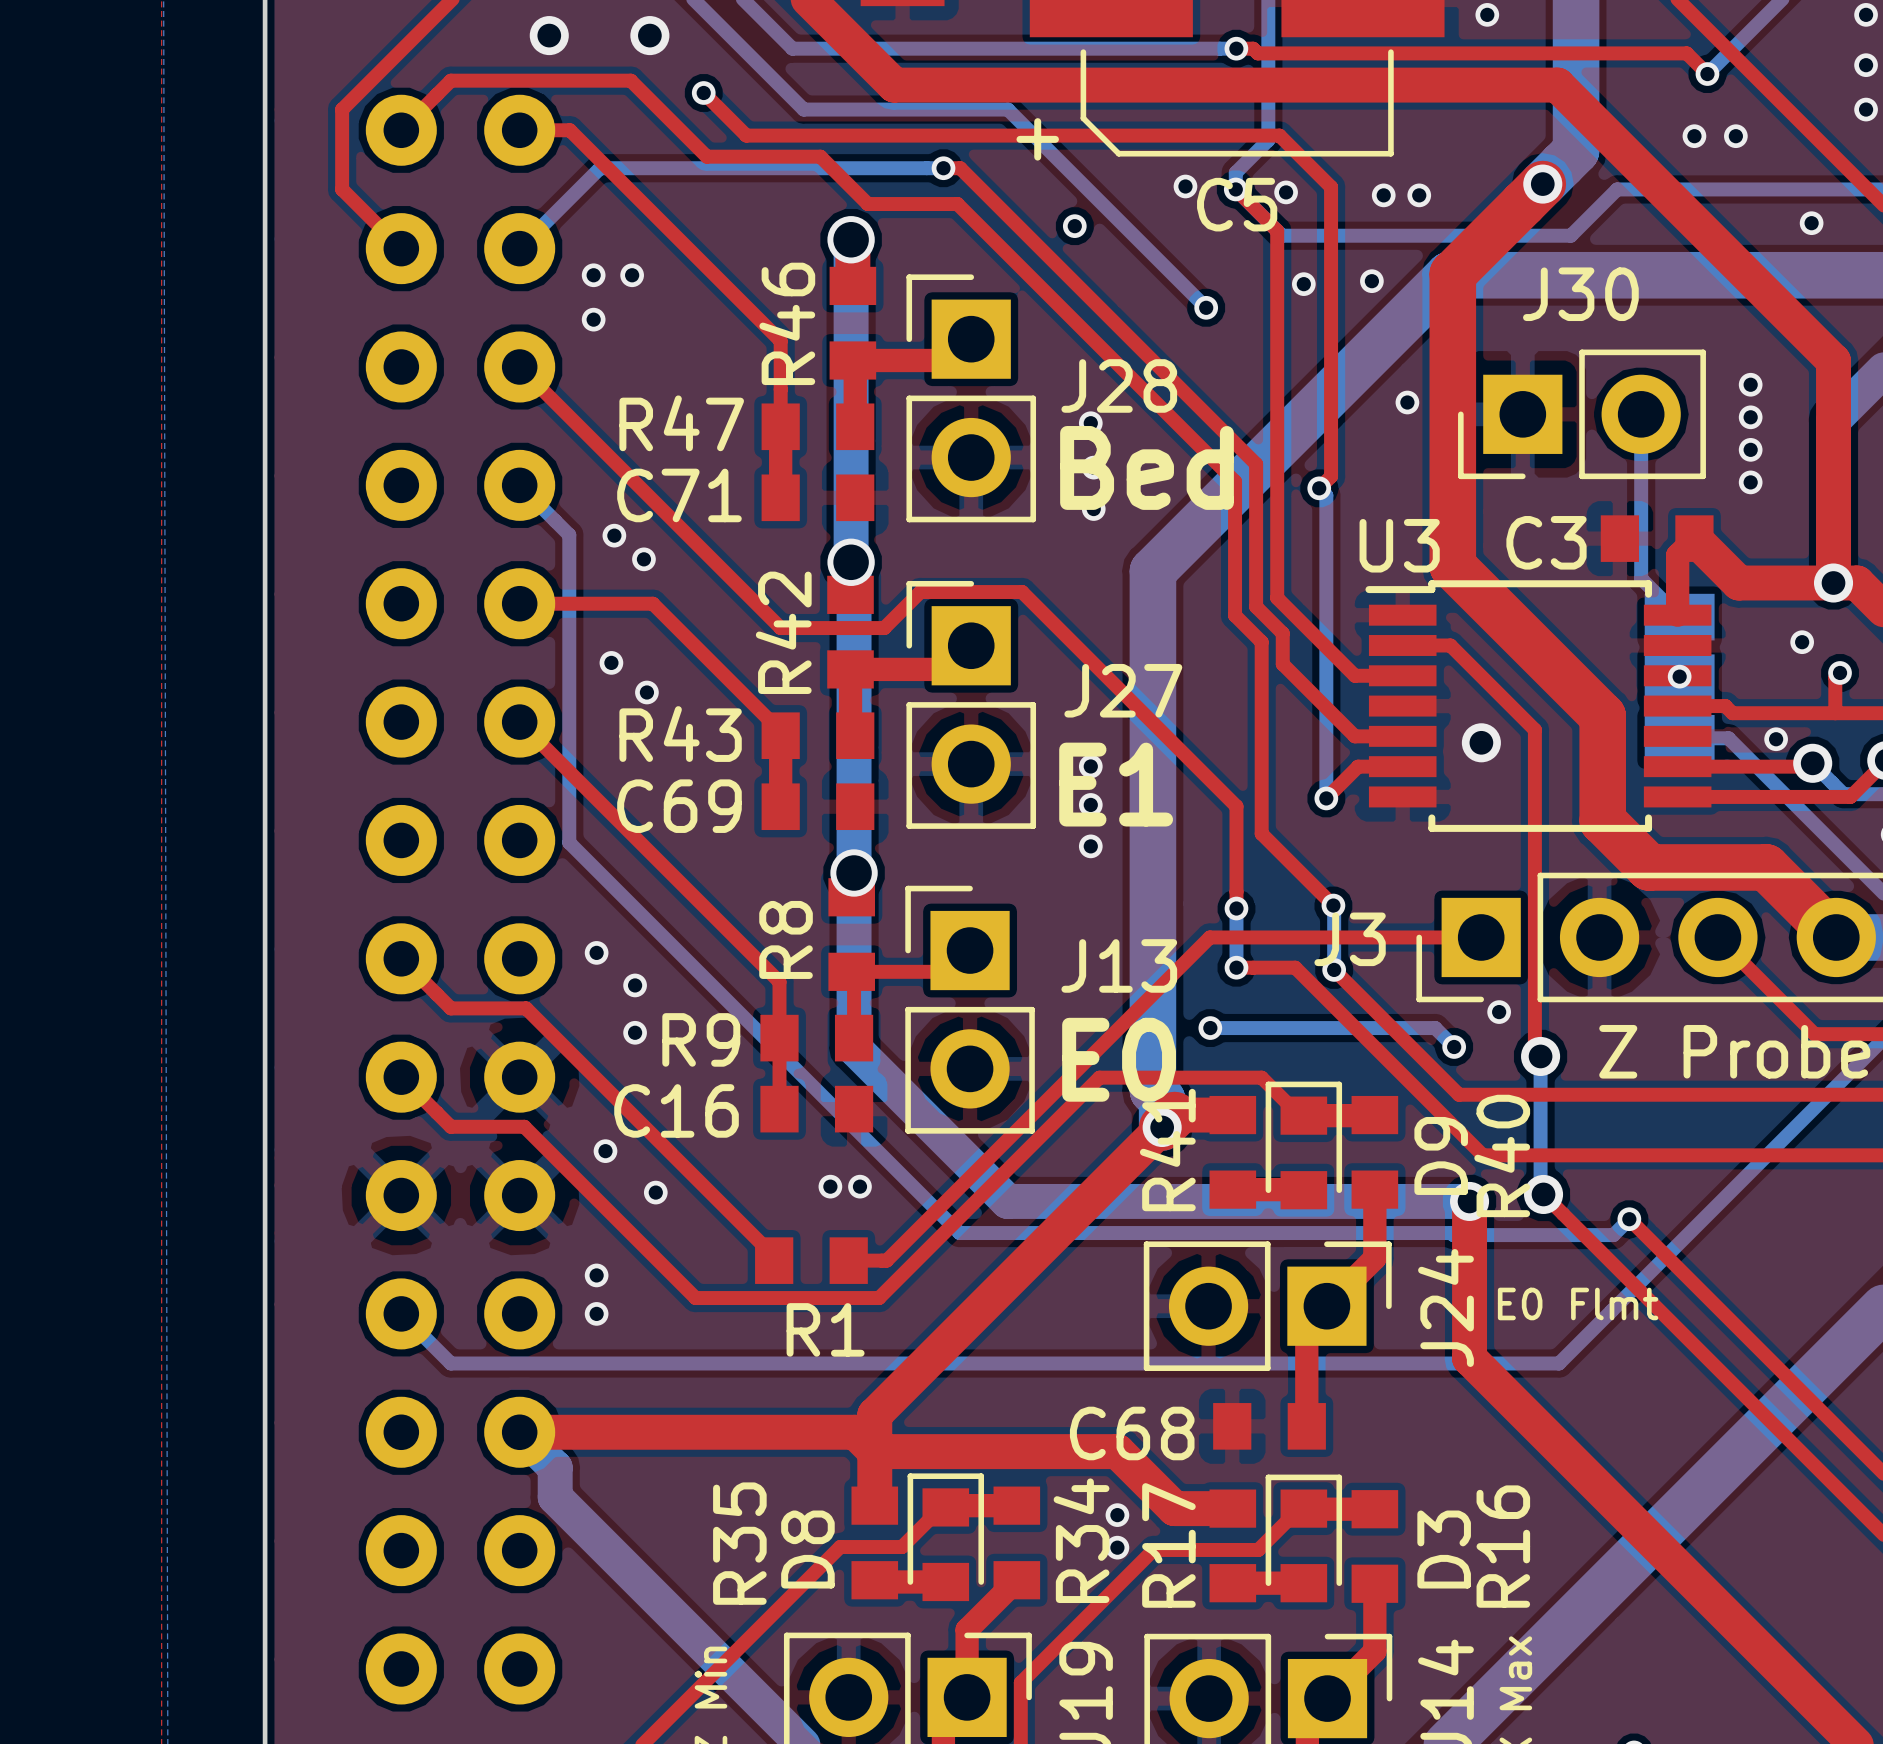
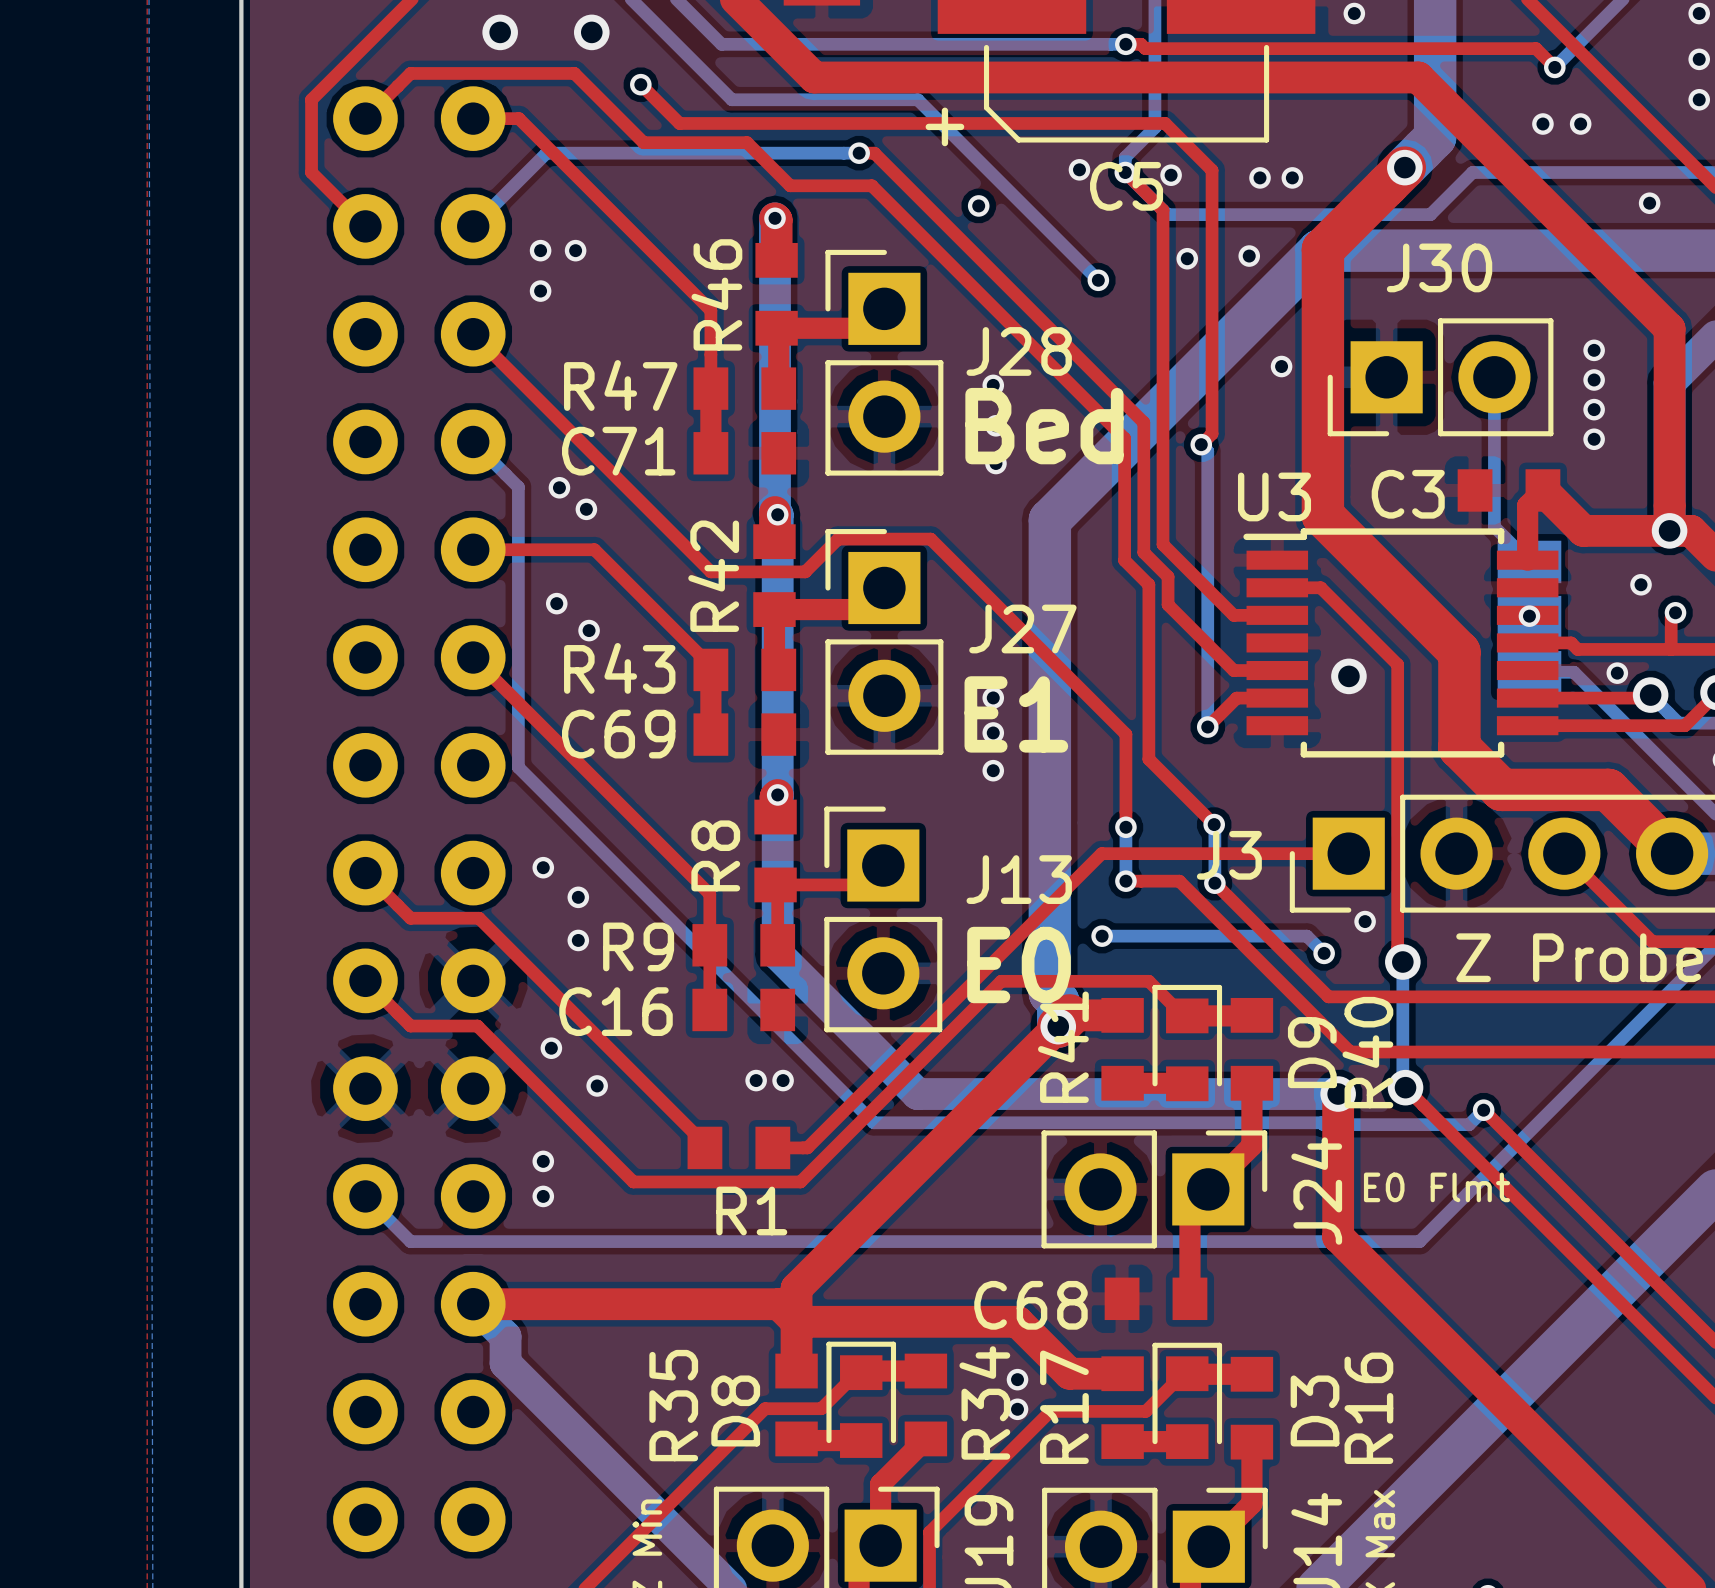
via size: [827, 216, 875, 264] -> [764, 207, 786, 230]
via size: [827, 538, 875, 586] -> [766, 503, 789, 526]
via size: [830, 849, 878, 897] -> [766, 784, 789, 806]

